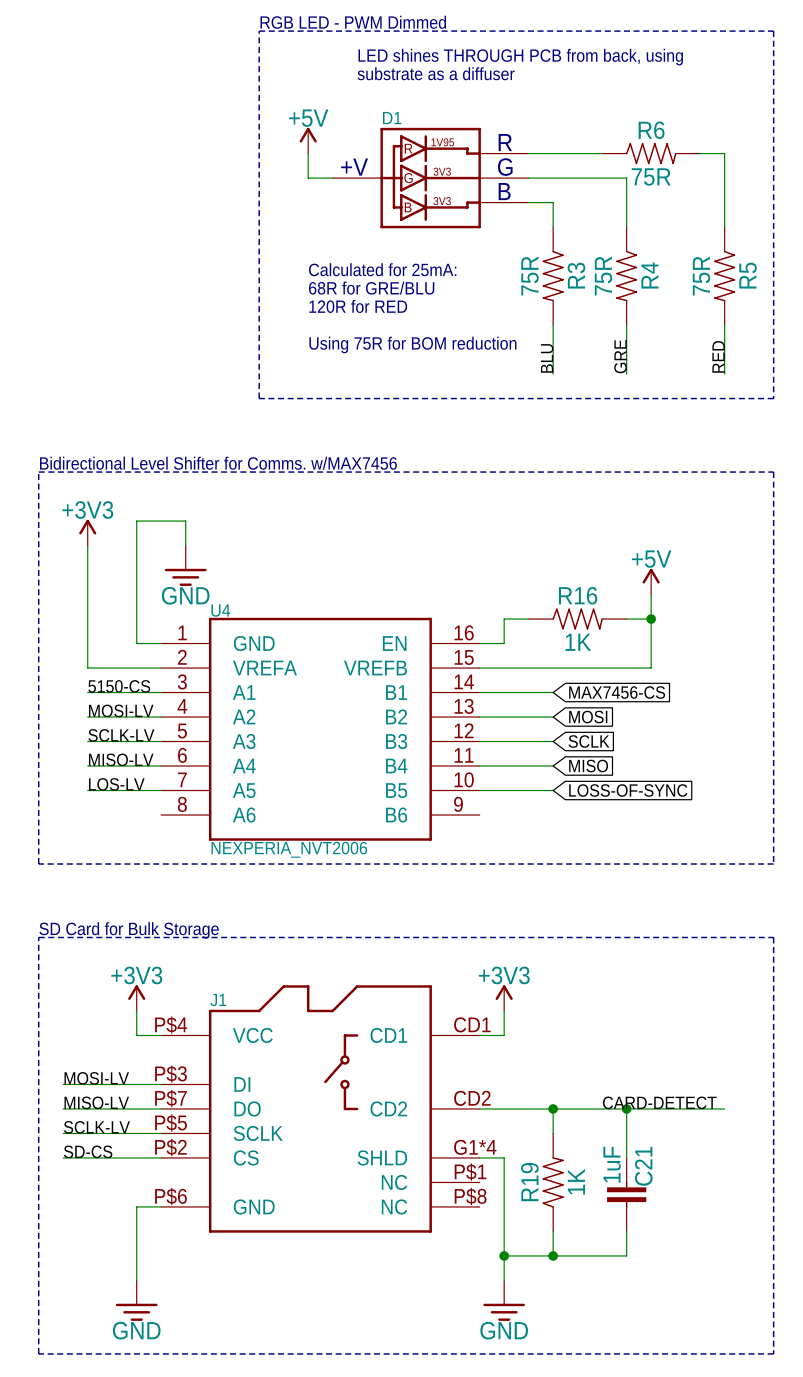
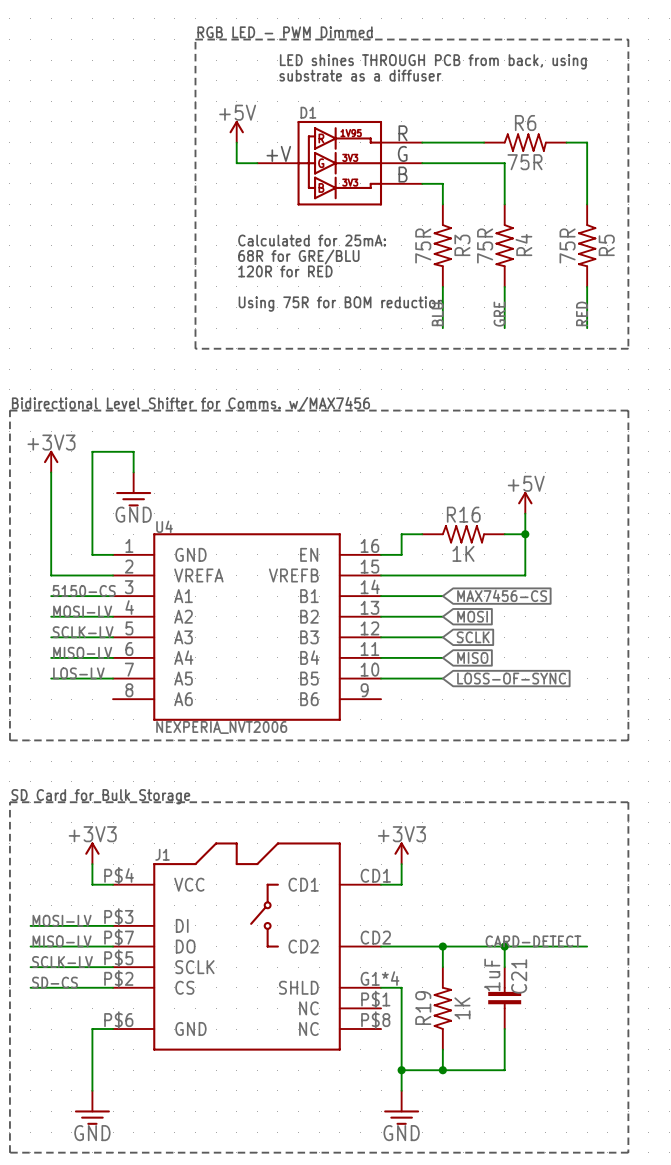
C21 position: (626, 1194) -> (504, 998)

